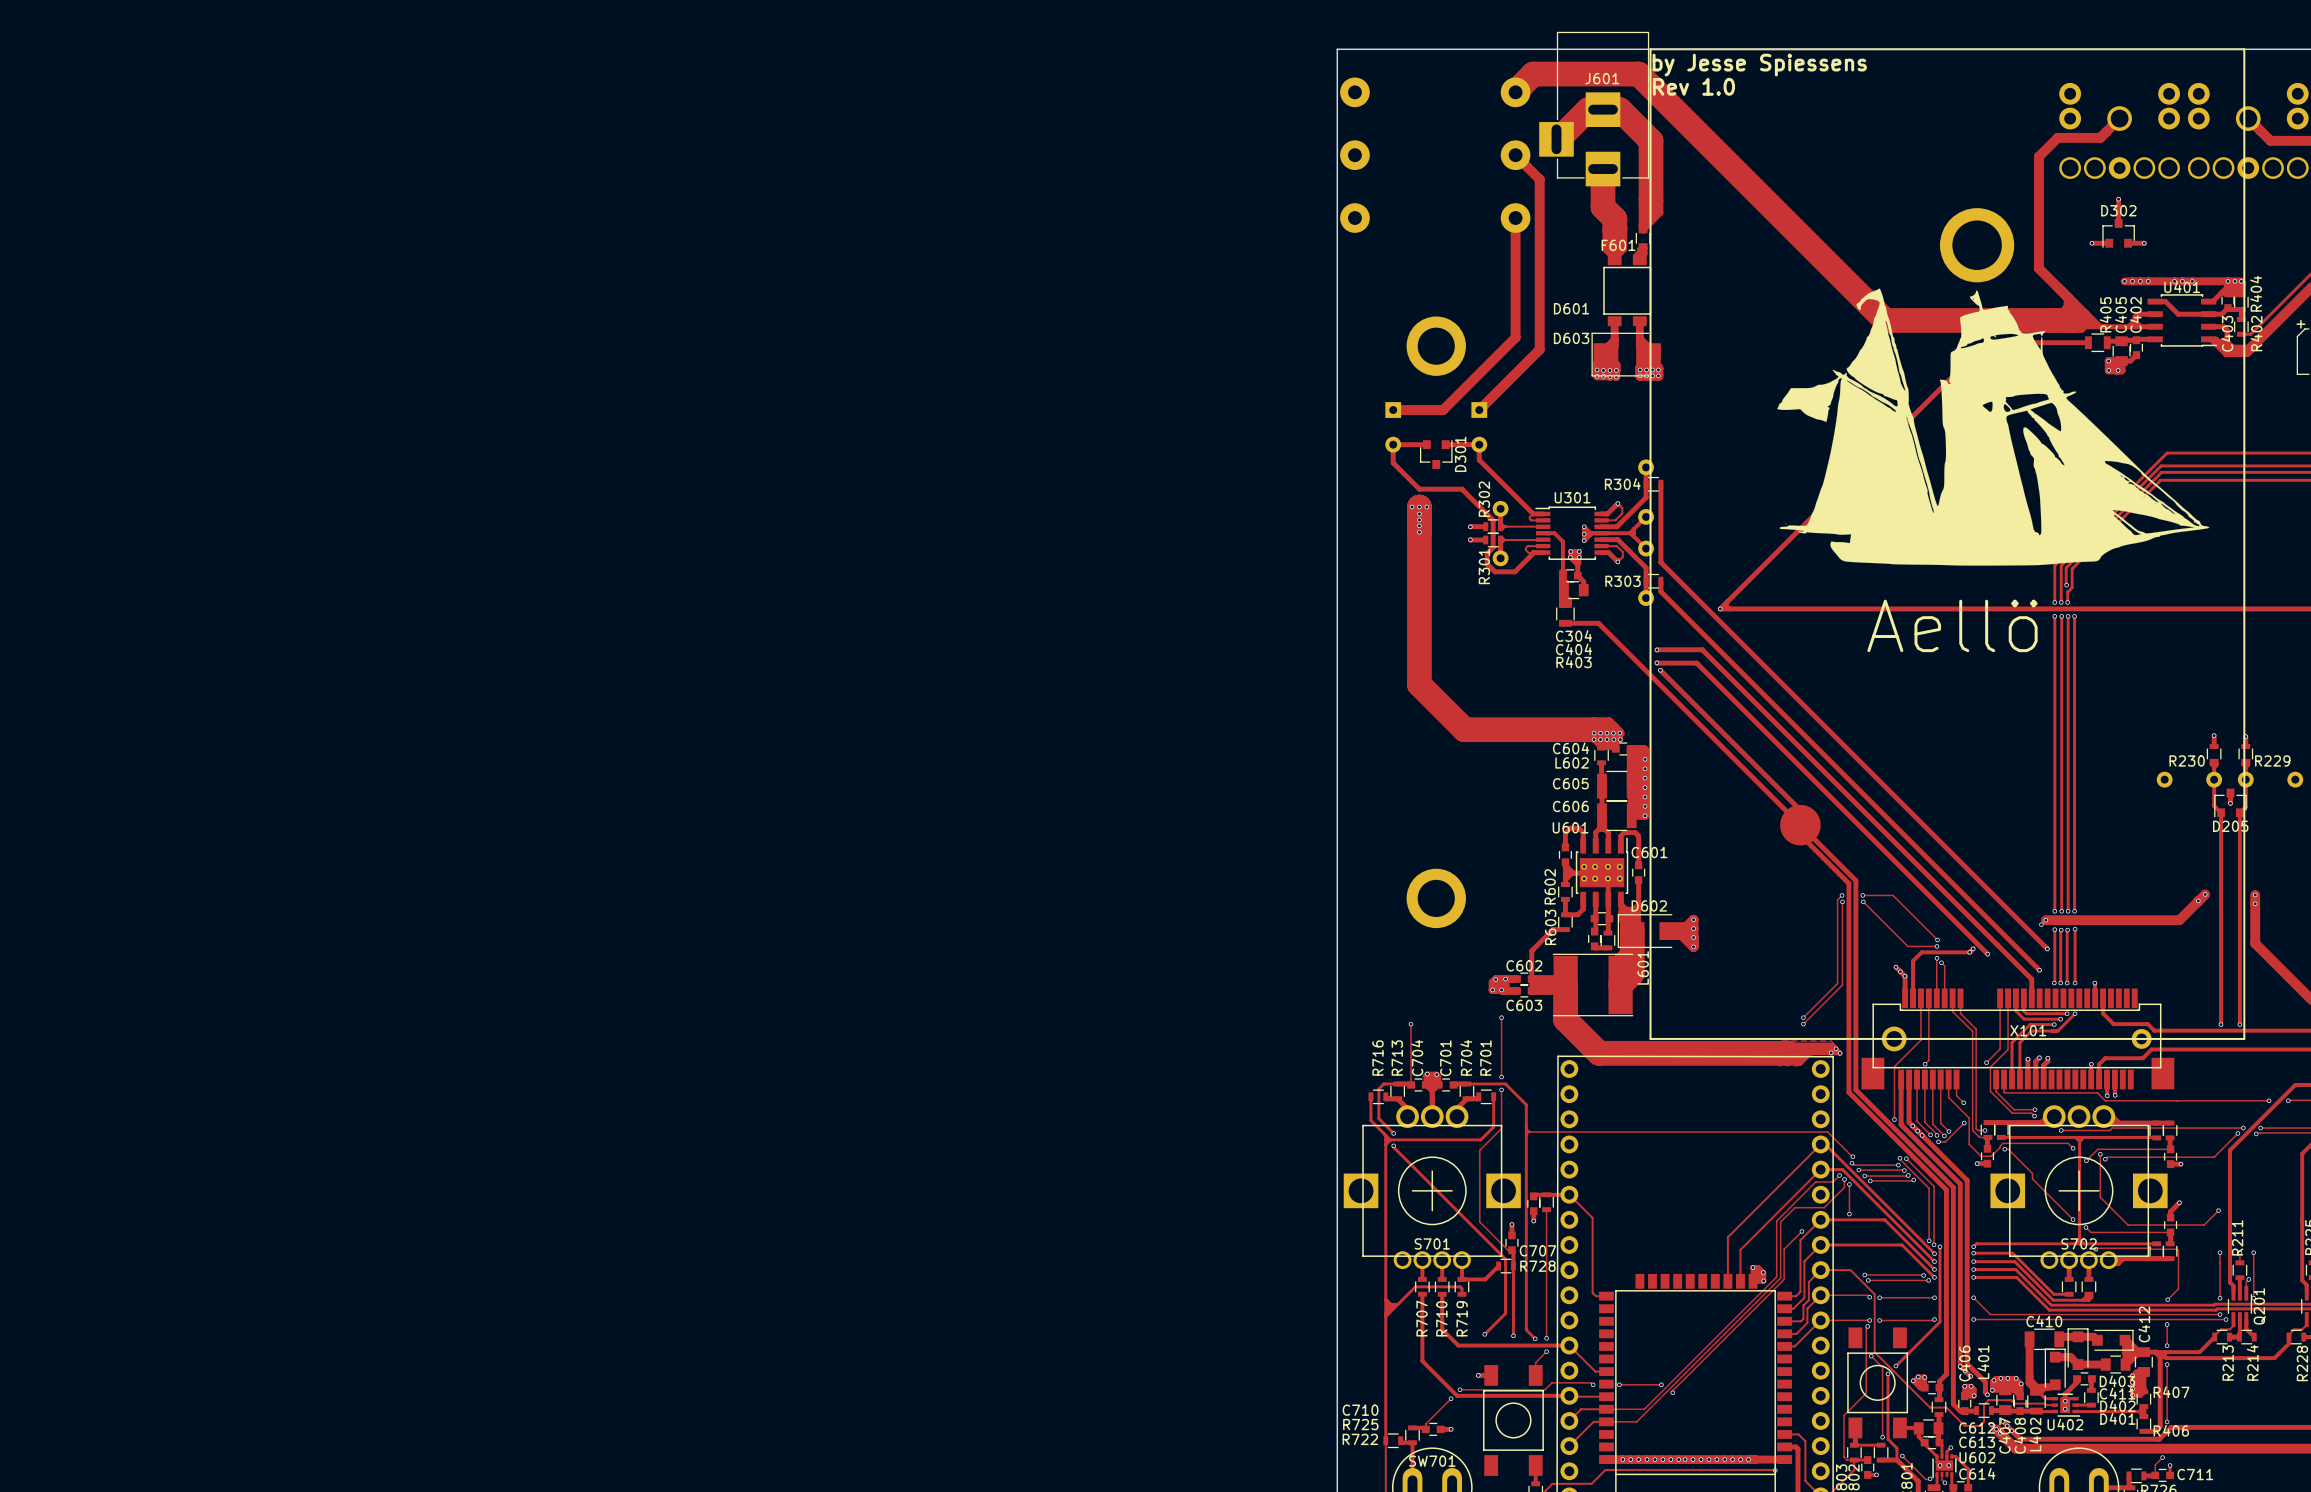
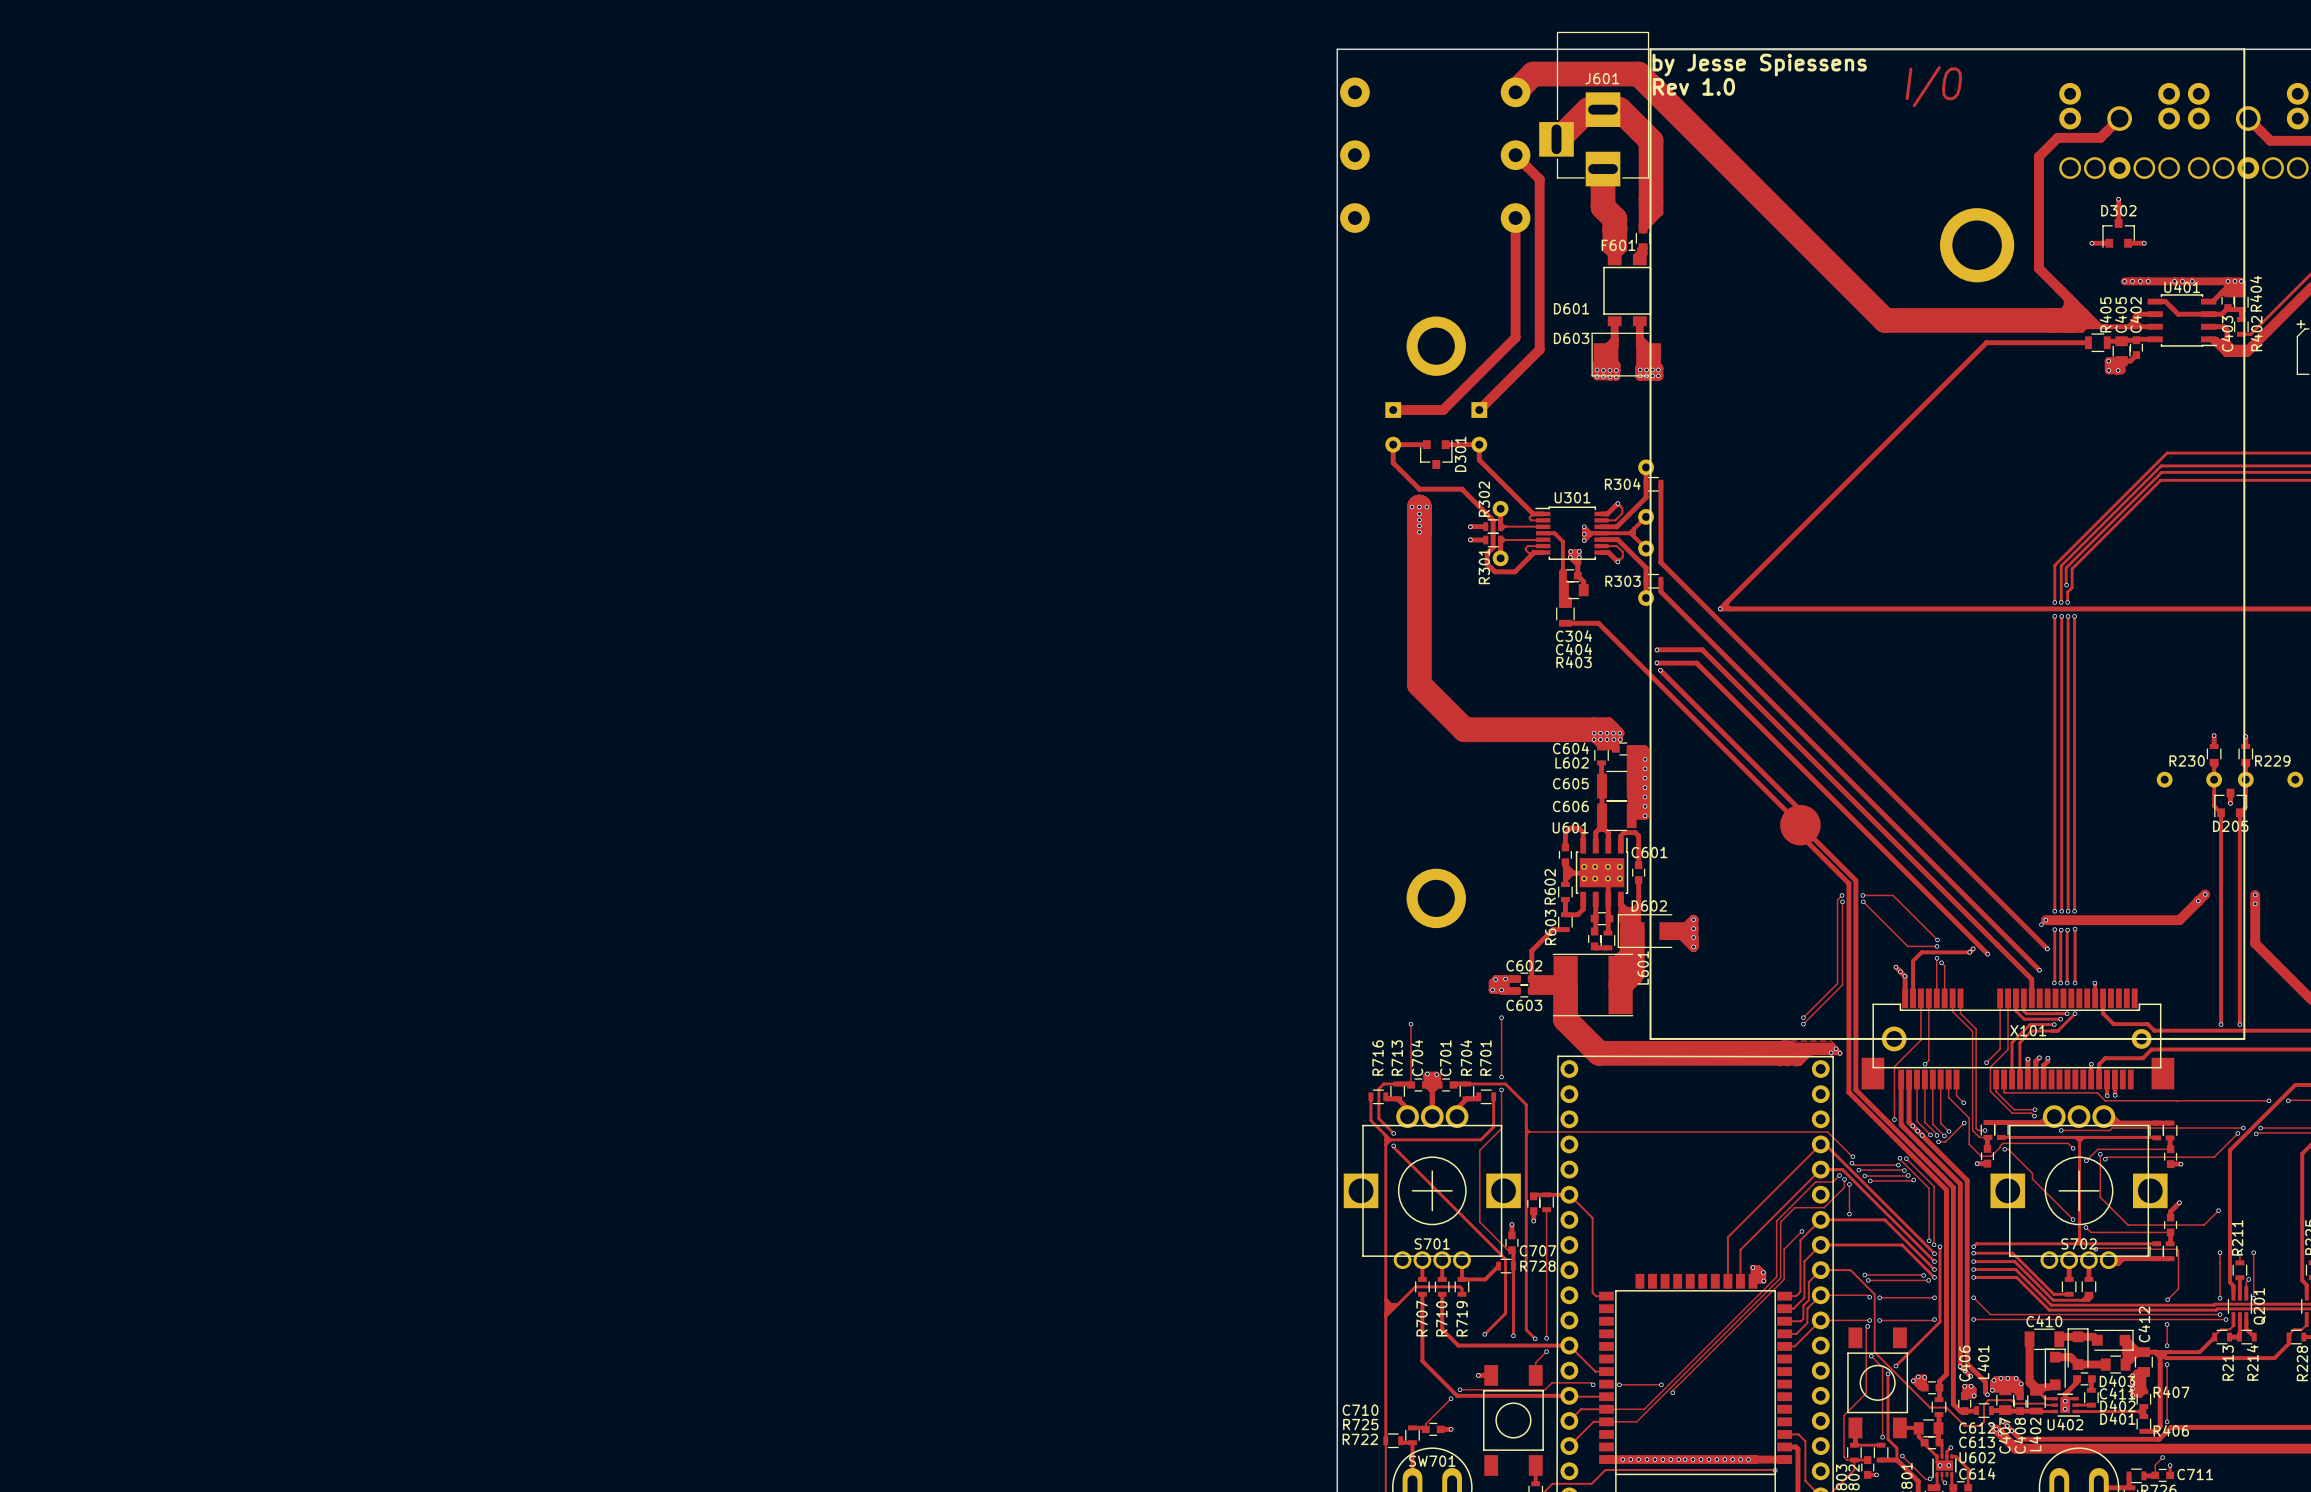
text: none -> I/O (1933, 86)
drawing: [1777, 288, 2210, 566] -> none
text: Aellö (1952, 625) -> none

